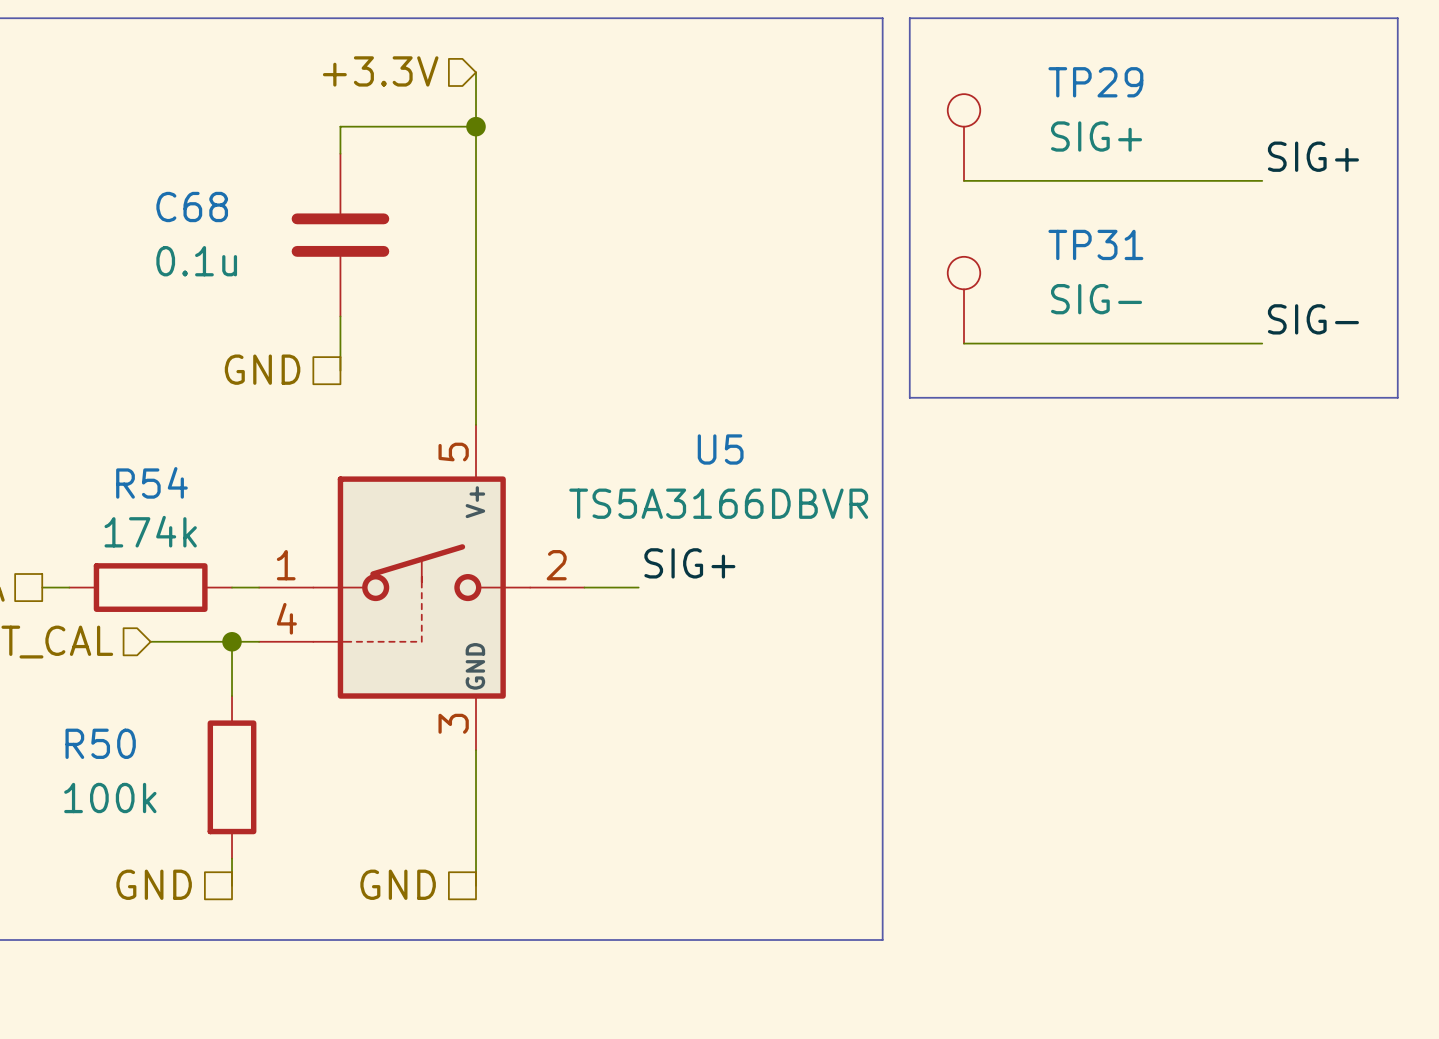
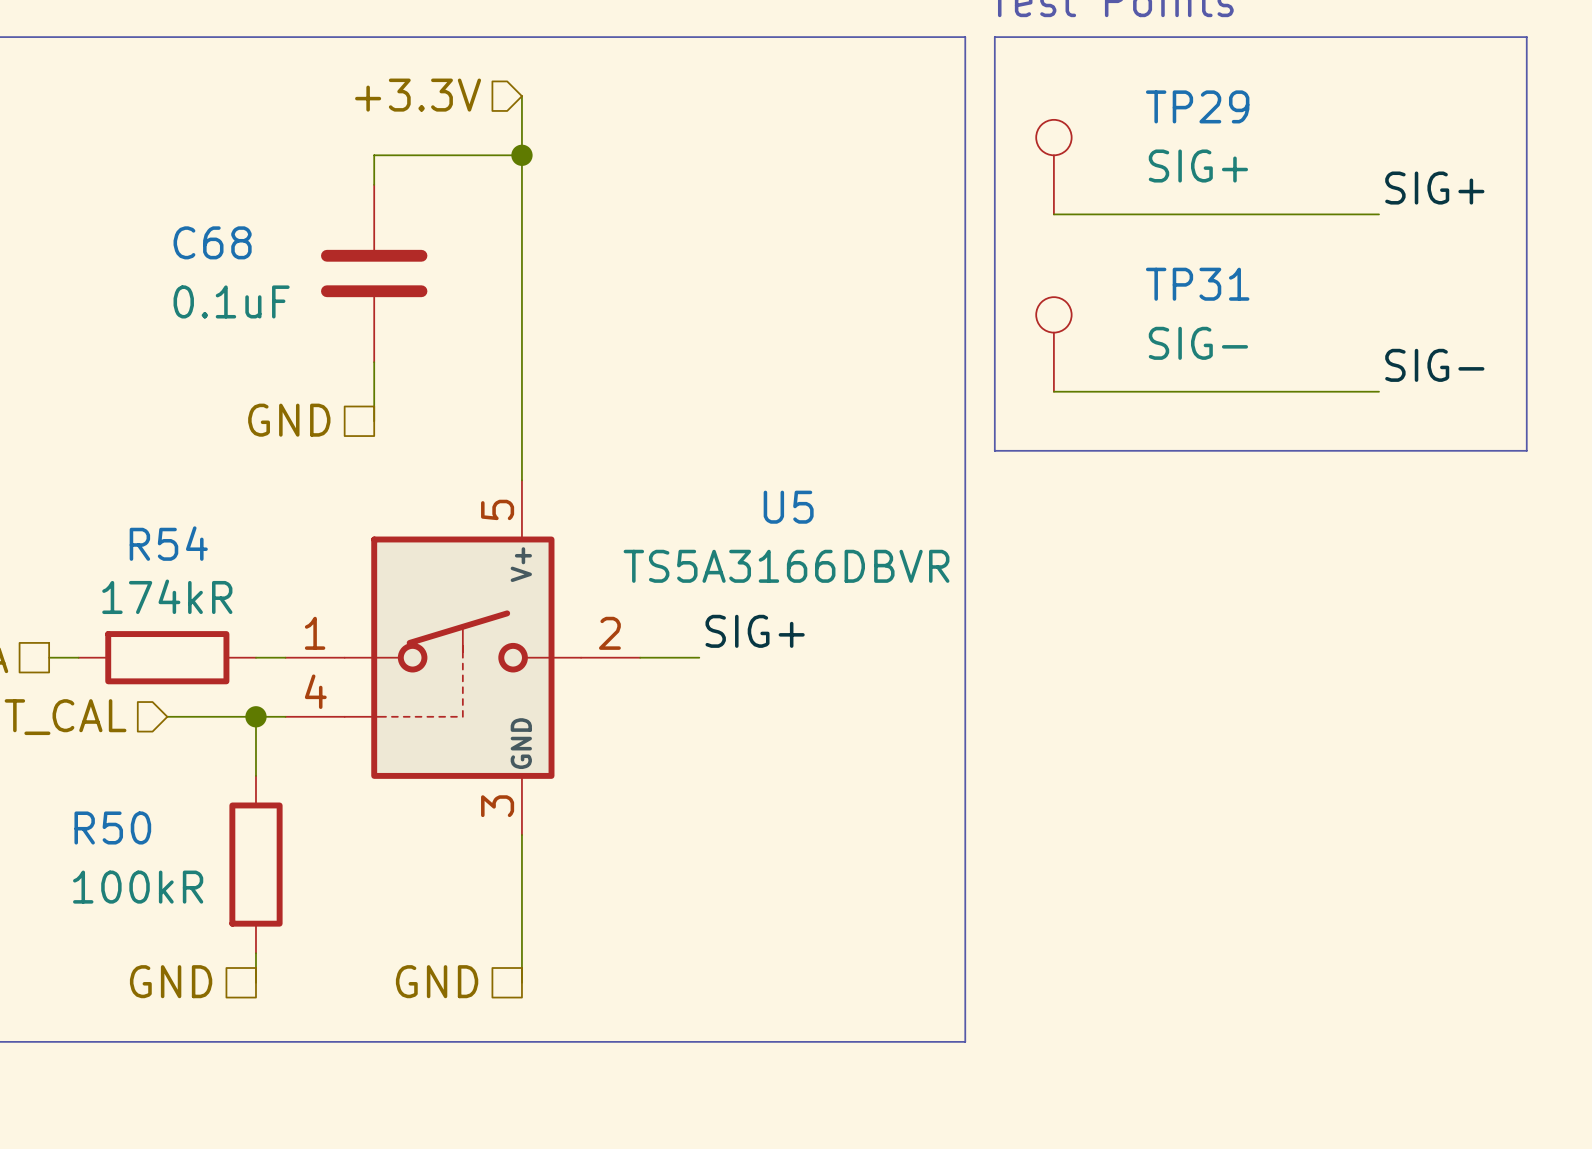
C68 value: 0.1u (196, 261) -> 0.1uF (231, 301)
R54 value: 174k (150, 531) -> 174kR (167, 596)
R50 value: 100k (110, 798) -> 100kR (138, 887)

